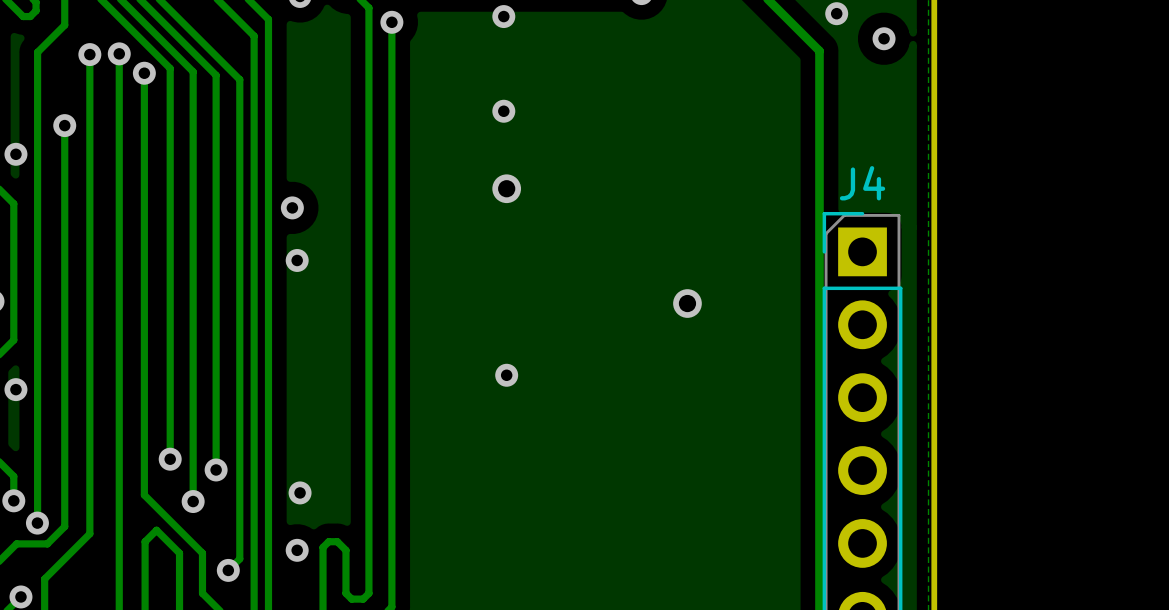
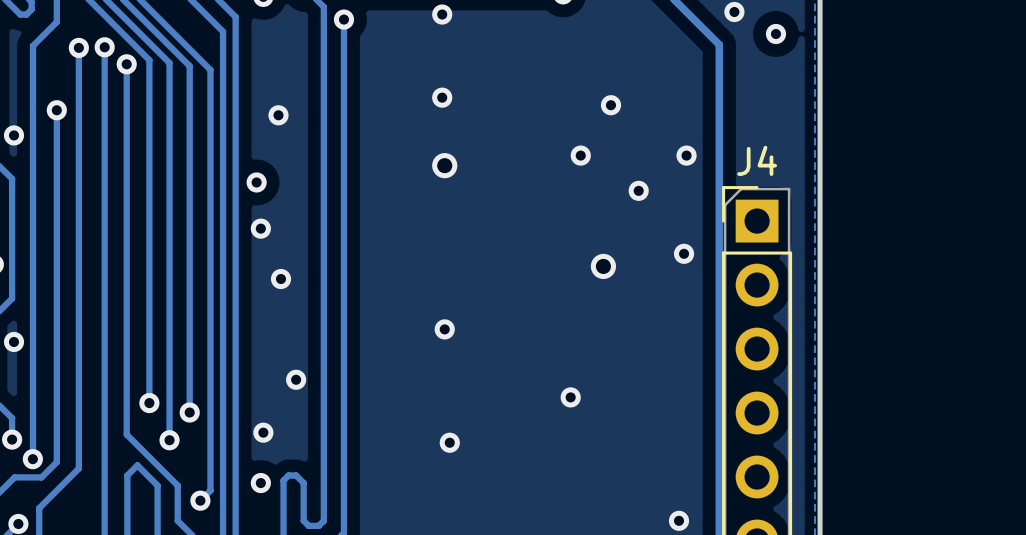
via: none -> (610, 105)
via: none -> (278, 115)
via: none -> (580, 155)
via: none -> (686, 155)
via: none -> (638, 190)
via: none -> (684, 253)
via: none -> (281, 279)
via: none -> (296, 379)
via: none -> (570, 397)
via: none -> (449, 442)
via: none -> (679, 520)

